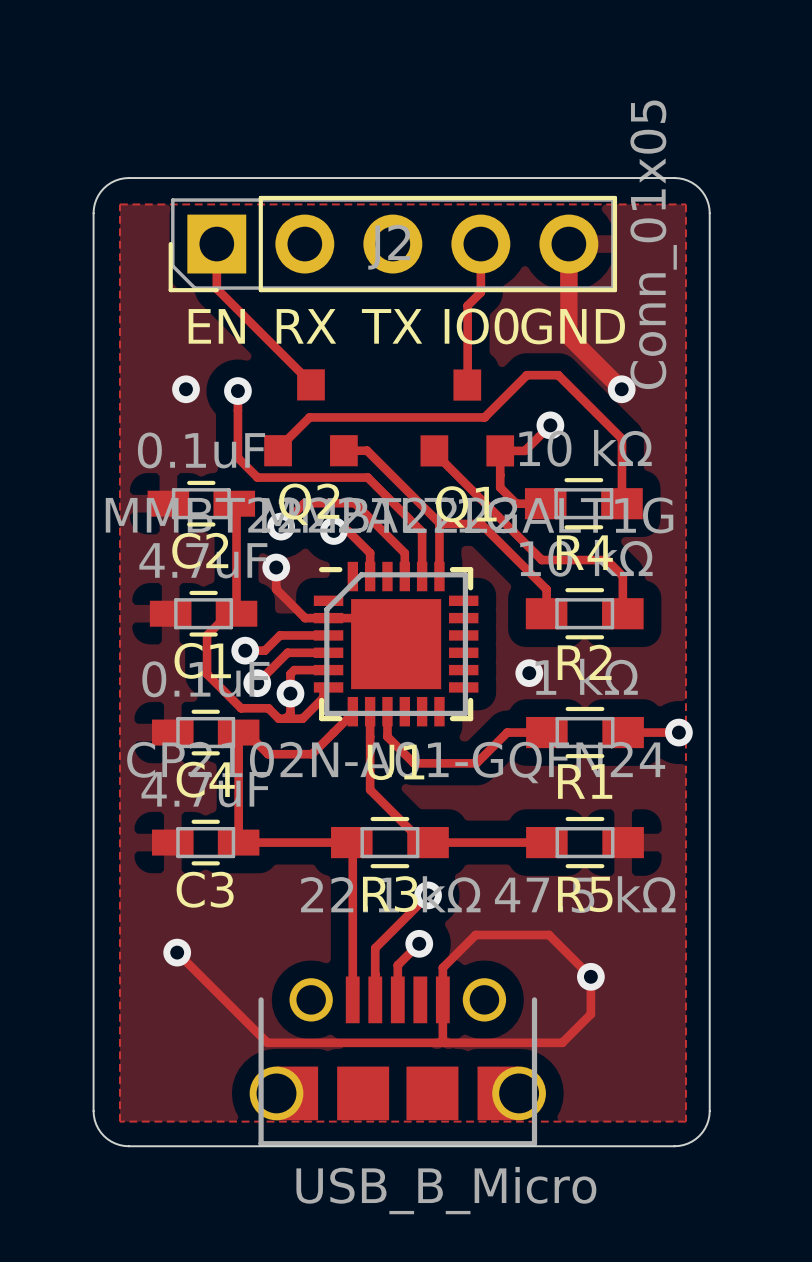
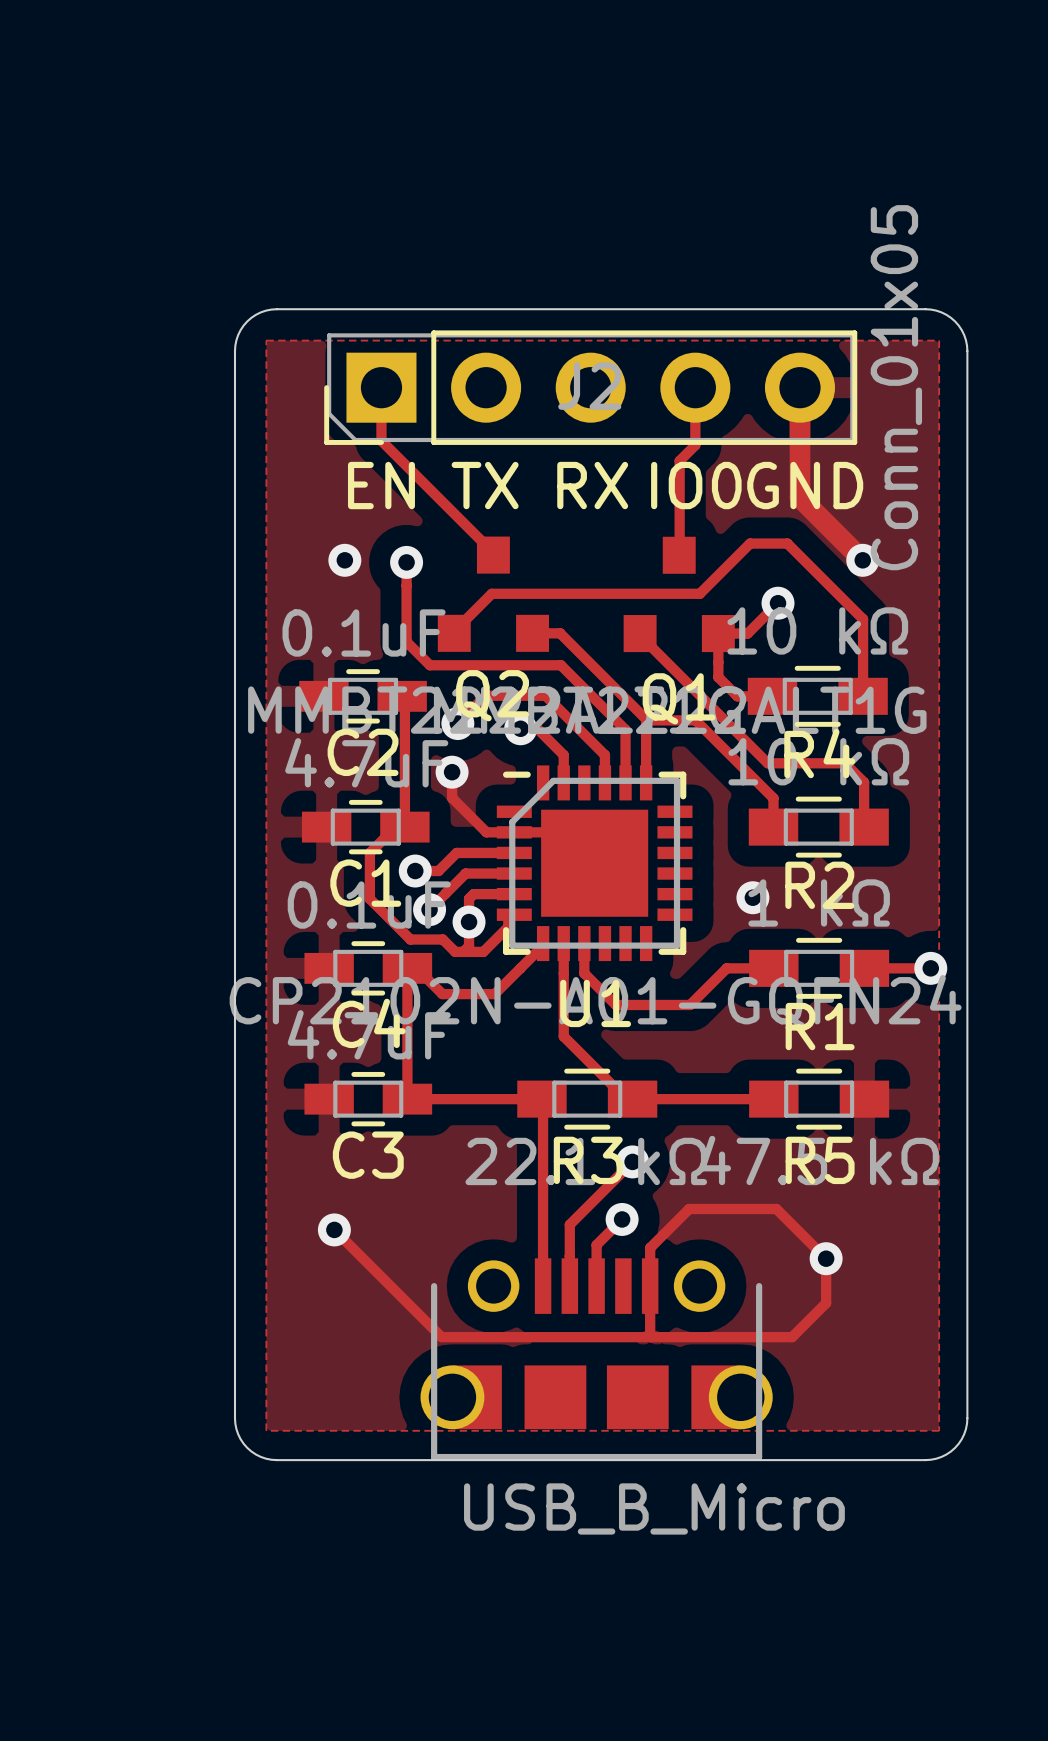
text: RX (306, 326) -> TX (485, 485)
text: TX (392, 326) -> RX (592, 485)

